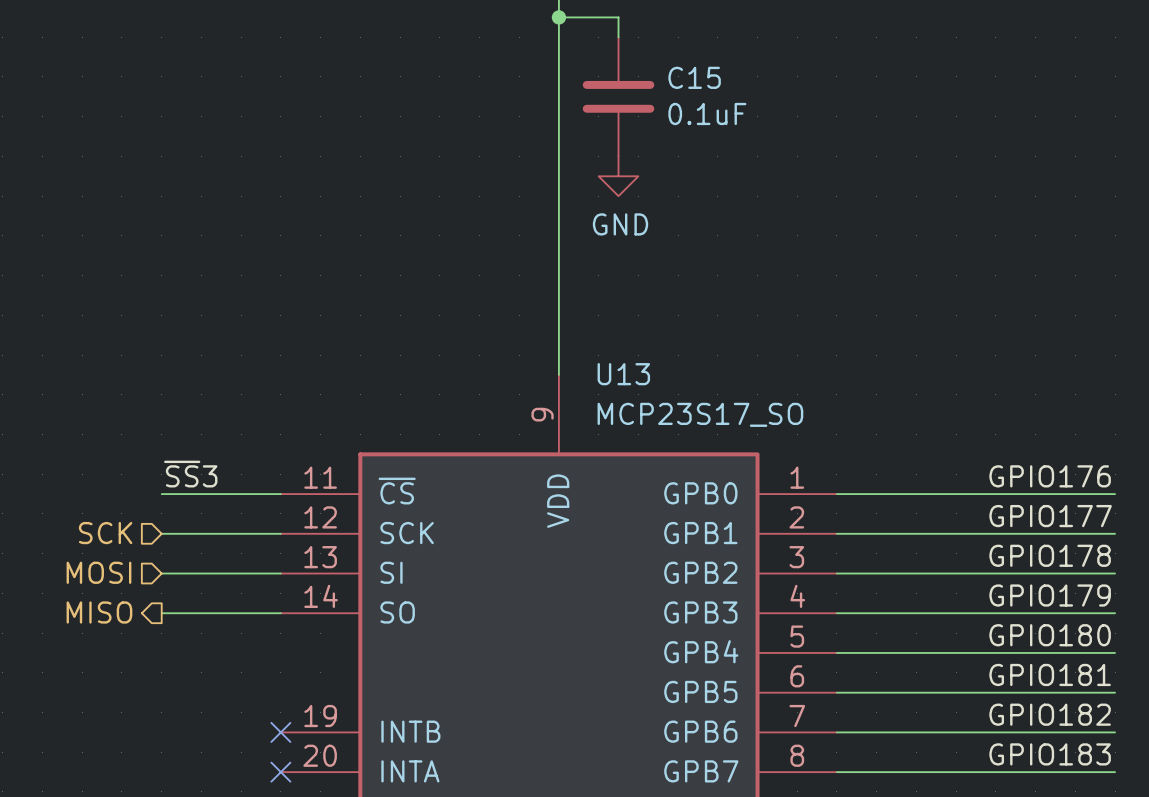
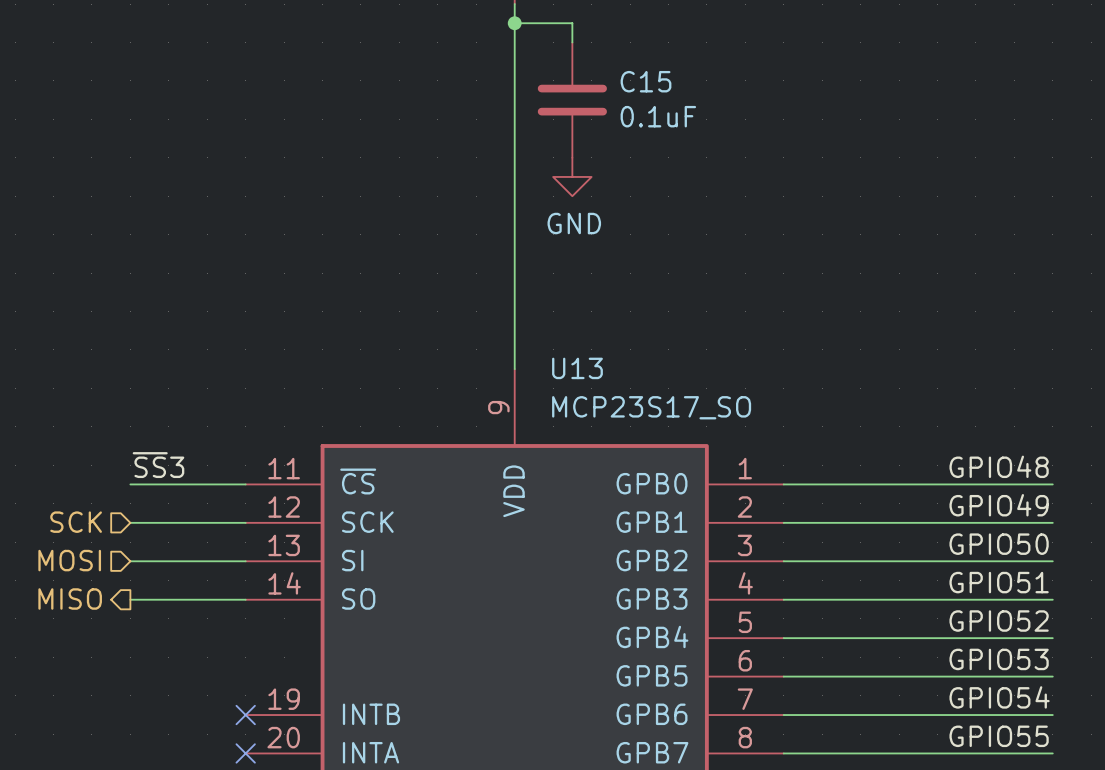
label: GPIO176 (1050, 476) -> GPIO48 (999, 466)
label: GPIO177 (1050, 516) -> GPIO49 (999, 505)
label: GPIO178 (1050, 555) -> GPIO50 (999, 544)
label: GPIO179 (1050, 595) -> GPIO51 (999, 582)
label: GPIO180 (1050, 635) -> GPIO52 (999, 621)
label: GPIO181 (1050, 674) -> GPIO53 (999, 659)
label: GPIO182 (1050, 714) -> GPIO54 (999, 697)
label: GPIO183 (1050, 754) -> GPIO55 (999, 736)

